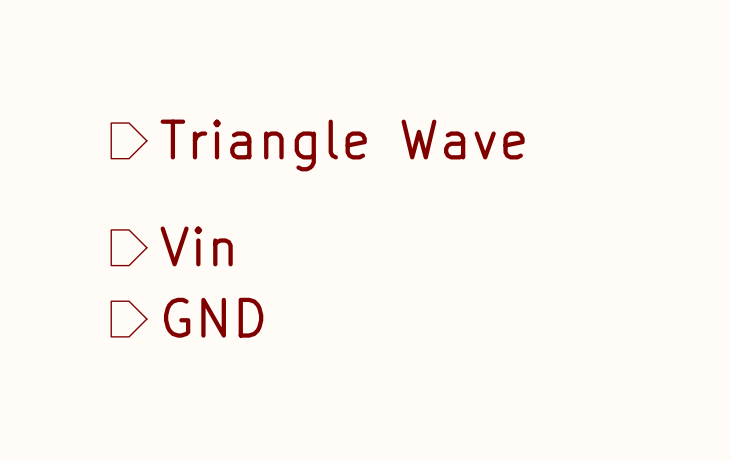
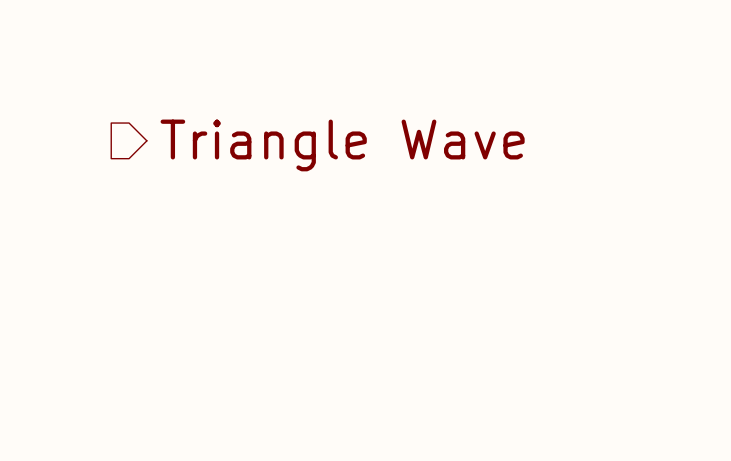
hierarchical label: Vin (196, 246) -> none
hierarchical label: GND (213, 317) -> none

